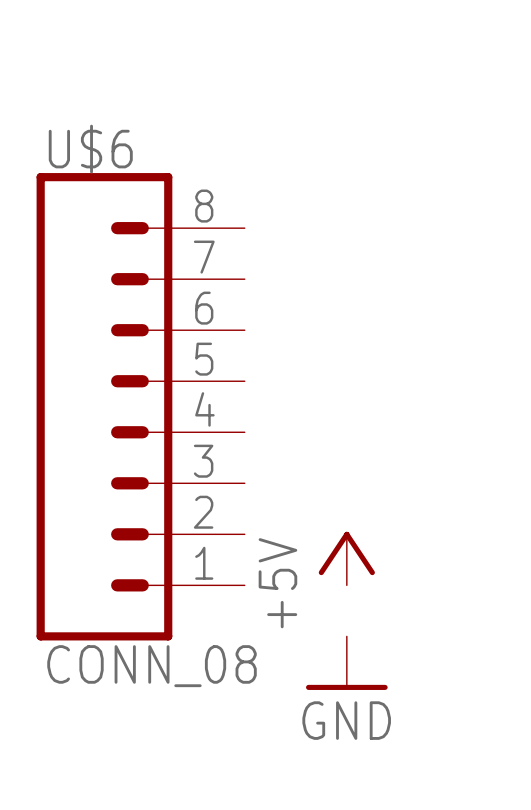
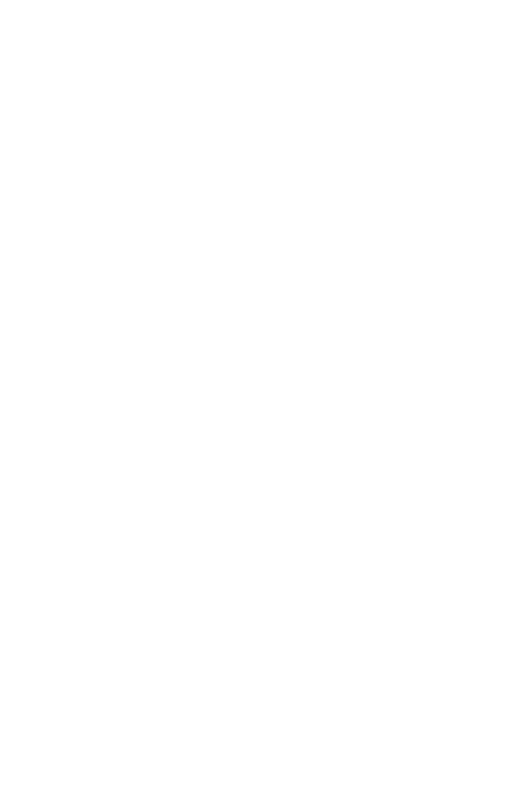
U$6: CONN_08 (140, 406) -> none
power symbol: +5V (346, 558) -> none
power symbol: GND (346, 663) -> none

